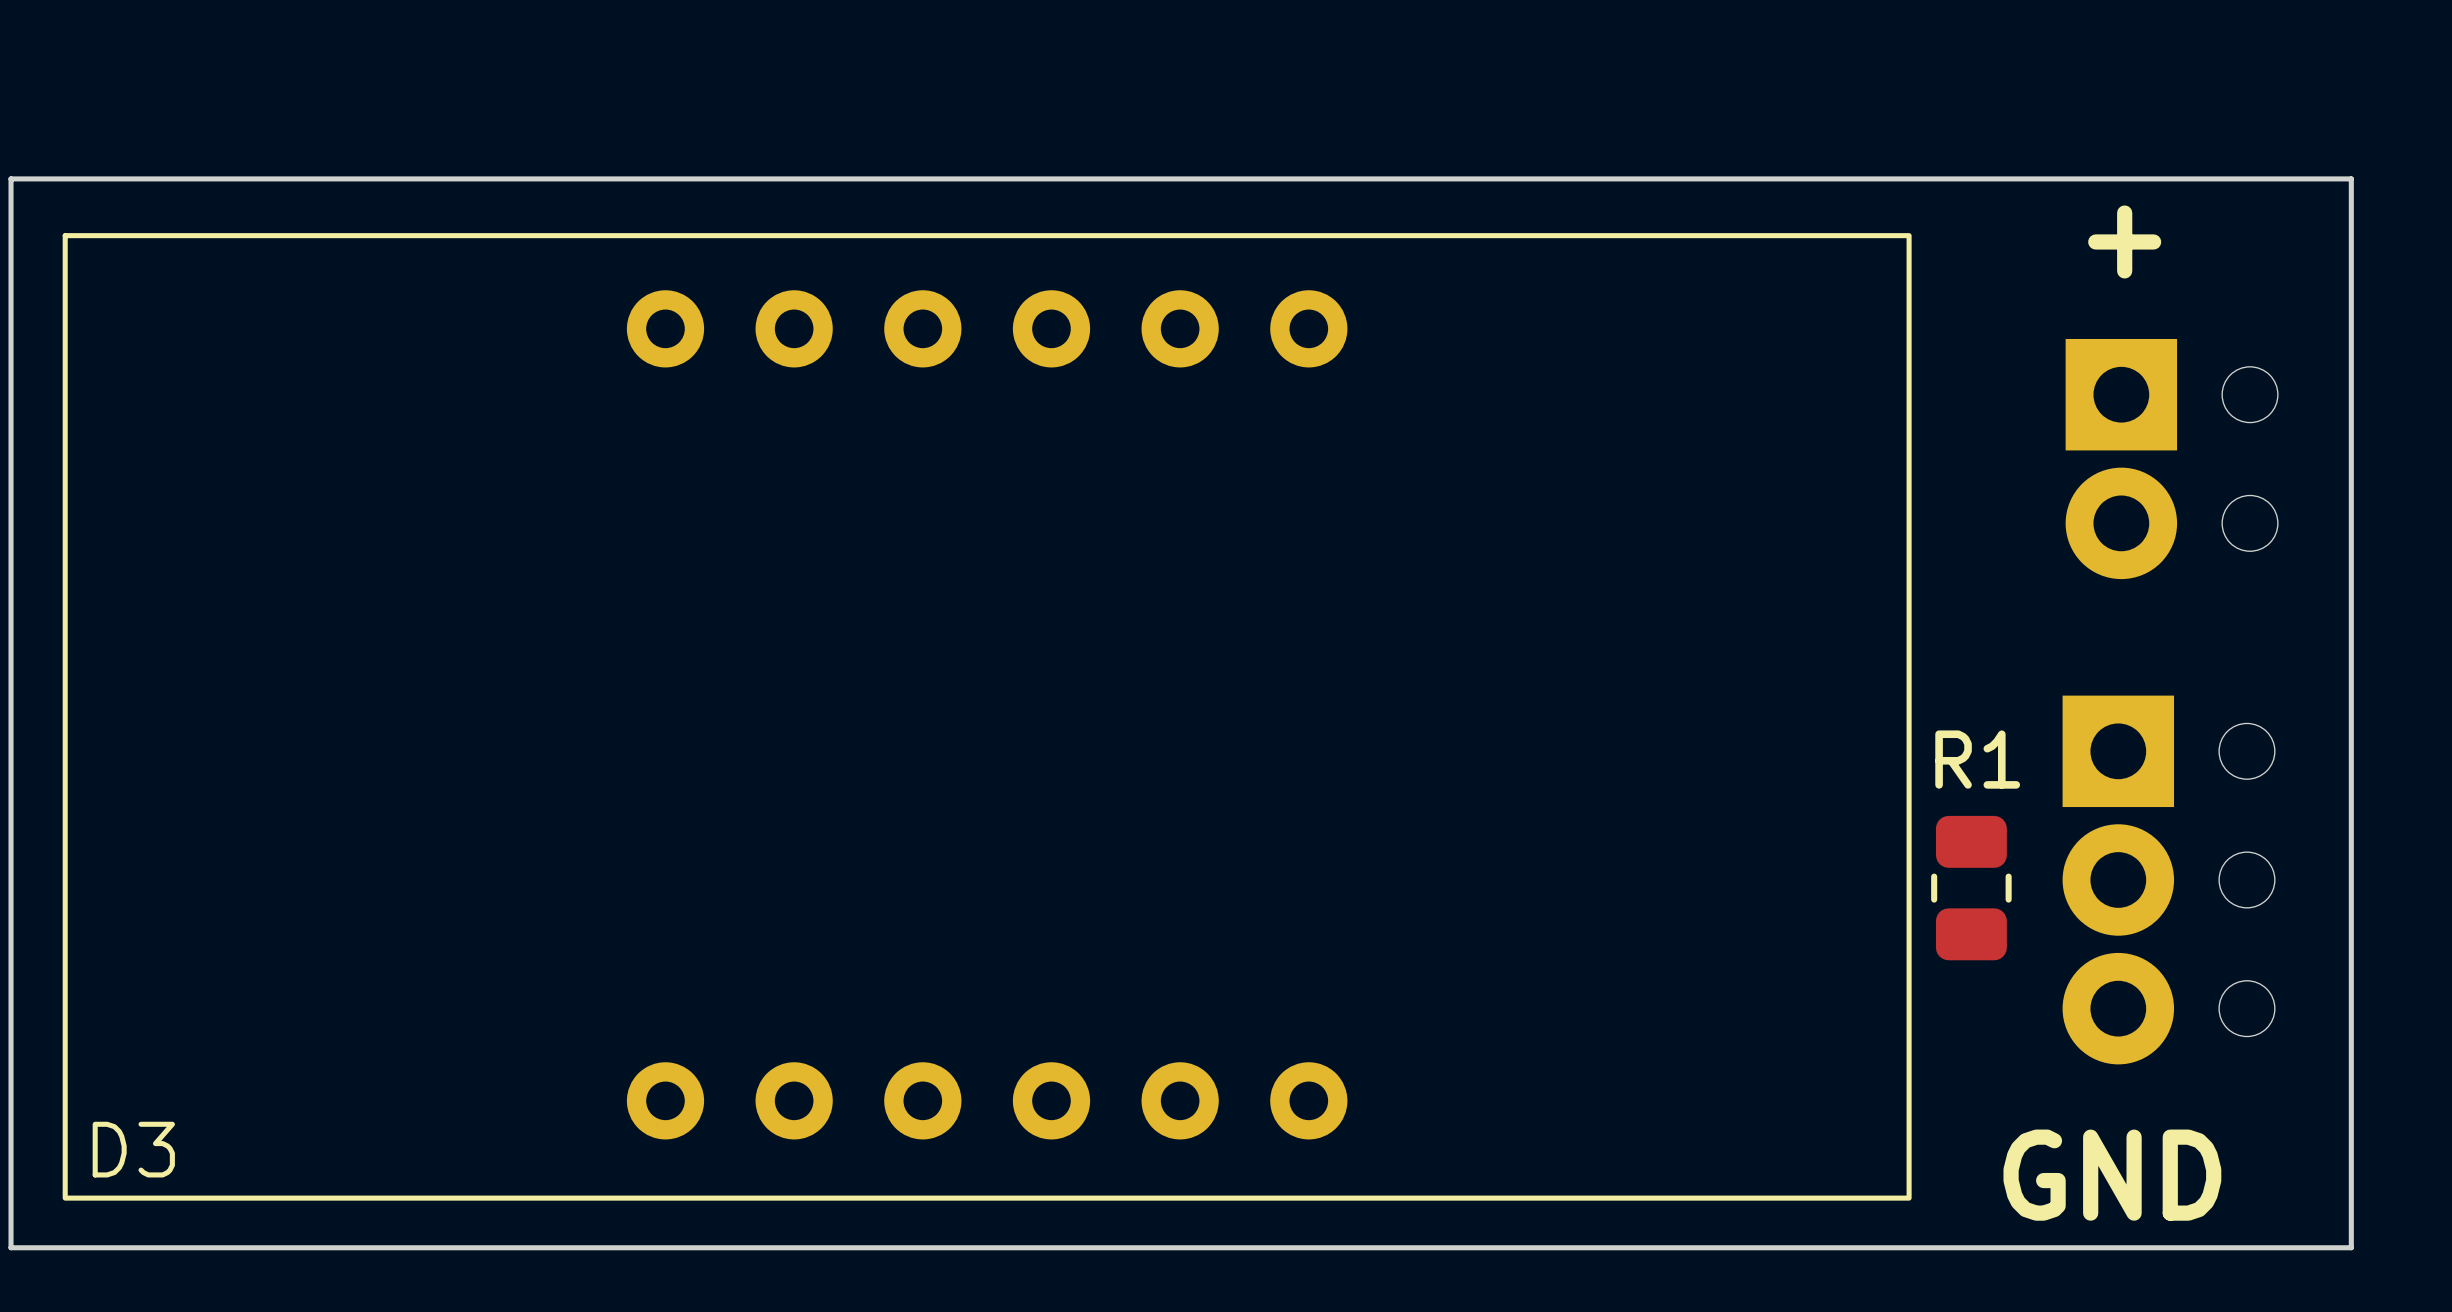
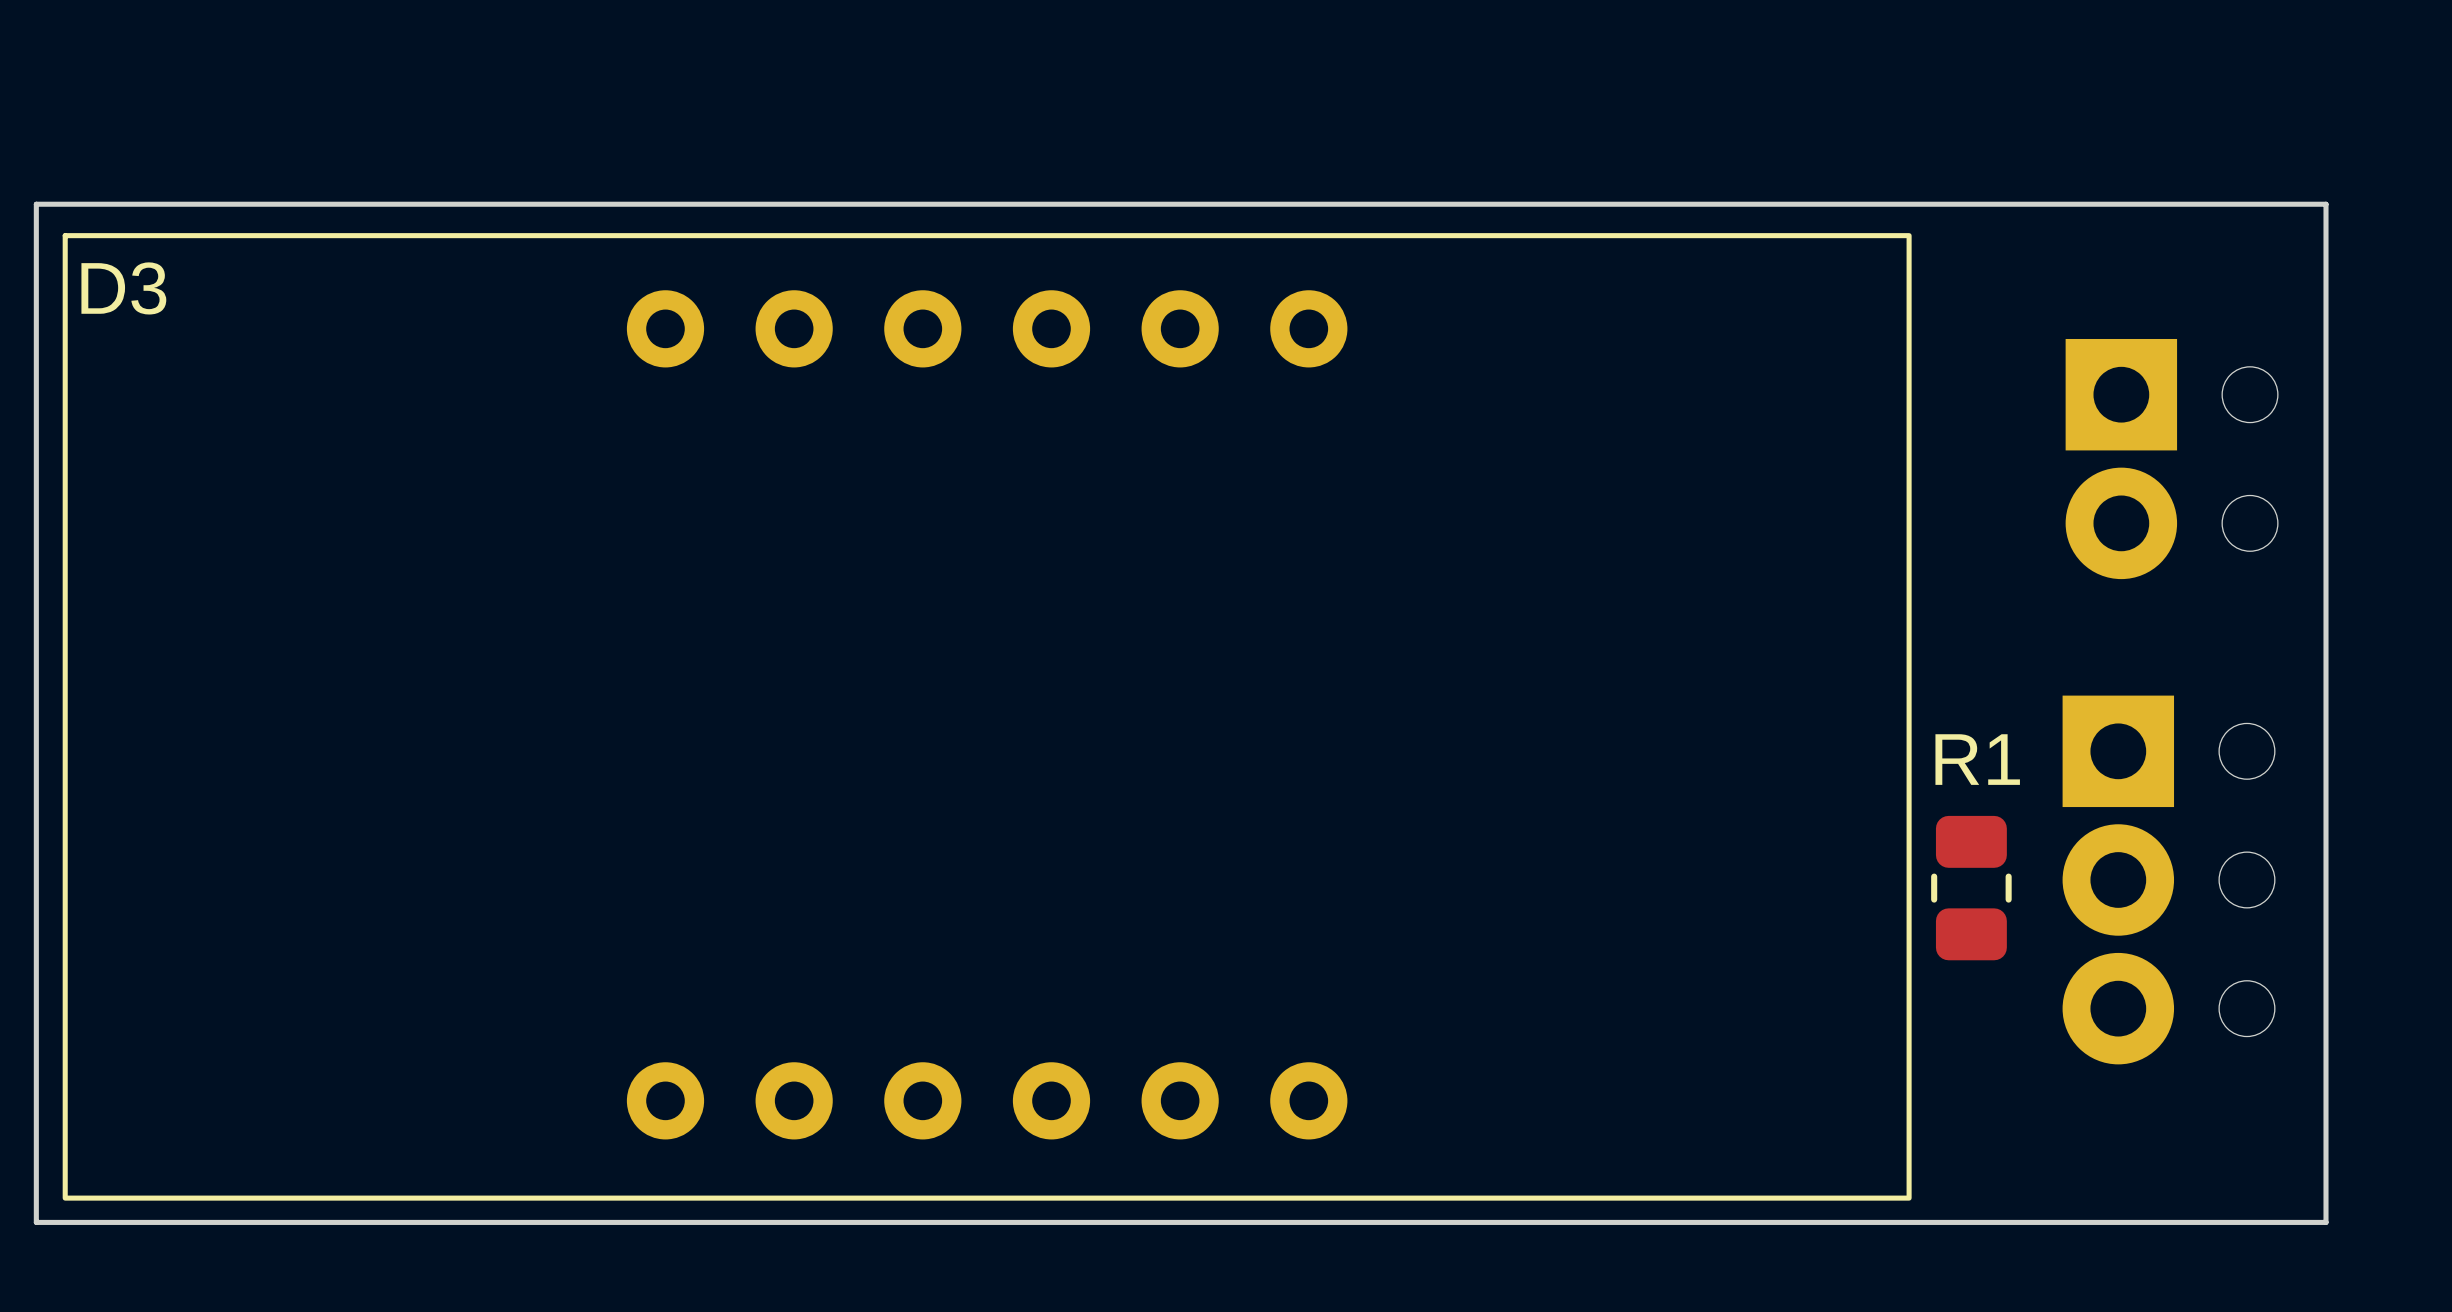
board edge: (11, 178) (2351, 178) (2351, 1247) (11, 1247) (11, 178) -> (36, 204) (36, 1222) (2326, 1222) (2326, 204) (36, 204)
text: + (2124, 241) -> none
D3 name position: D3 (133, 1149) -> D3 (123, 288)
text: GND (2112, 1175) -> none

